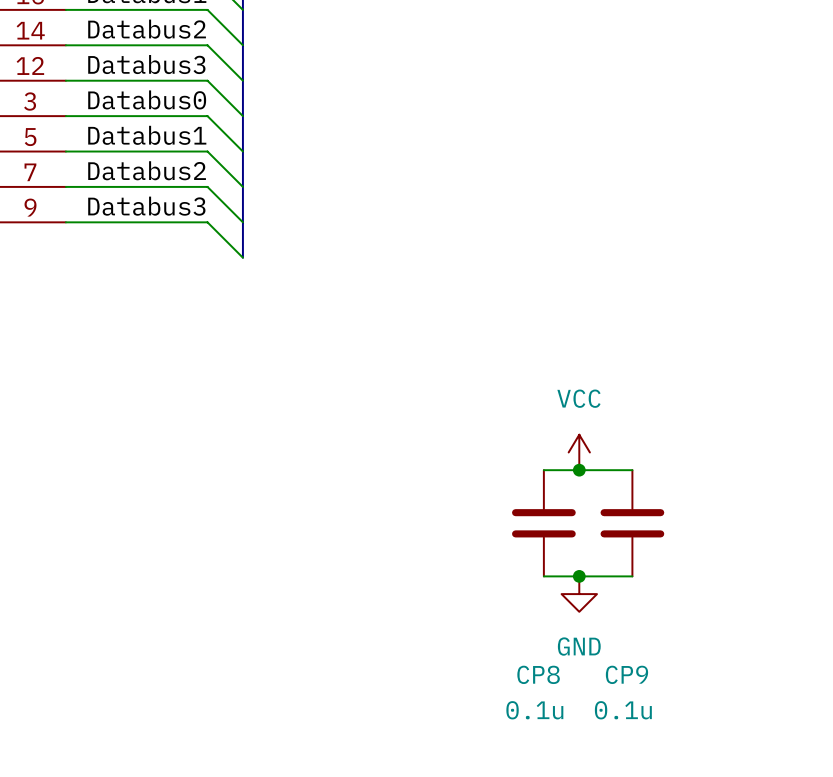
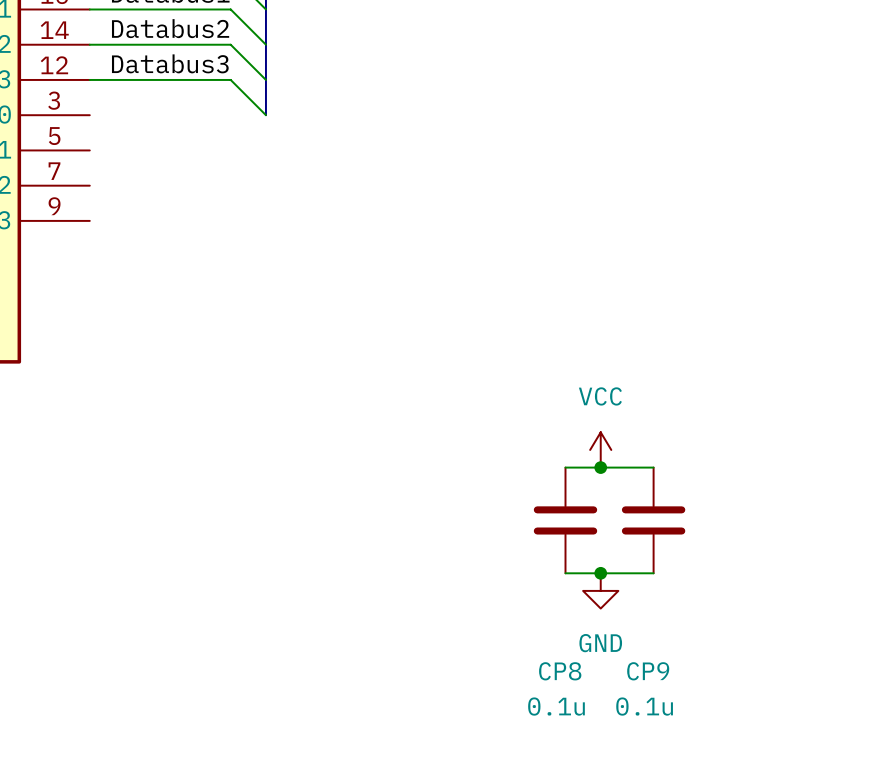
label: Databus0 (147, 99) -> none
wire: (65, 116) (207, 116) (242, 151) -> none
bus: (242, 116) (242, 257) -> none
label: Databus1 (147, 135) -> none
wire: (65, 151) (207, 151) (242, 186) -> none
label: Databus2 (147, 170) -> none
wire: (65, 186) (207, 186) (242, 222) -> none
label: Databus3 (146, 206) -> none
wire: (65, 222) (207, 222) (242, 257) -> none

